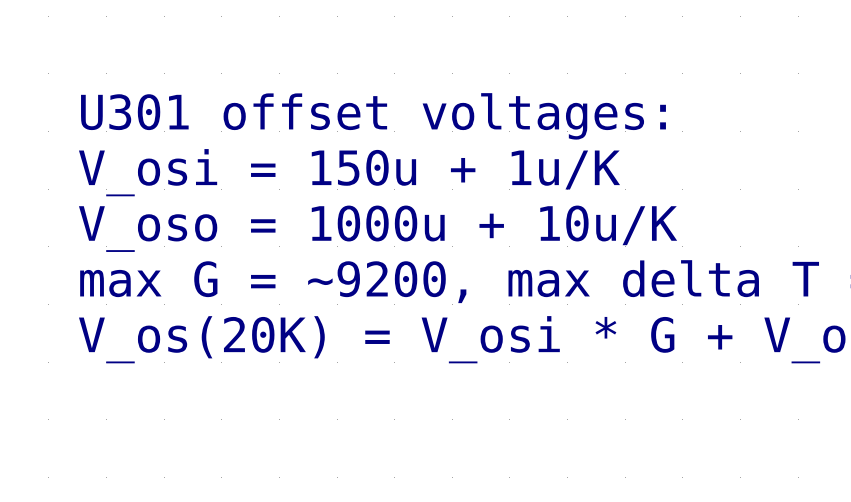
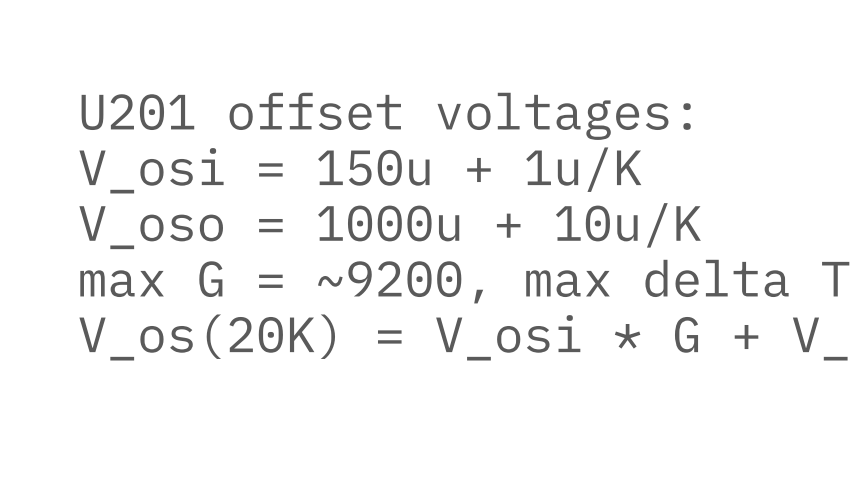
text: U301 offset voltages: (373, 116) -> U201 offset voltages: (386, 116)

